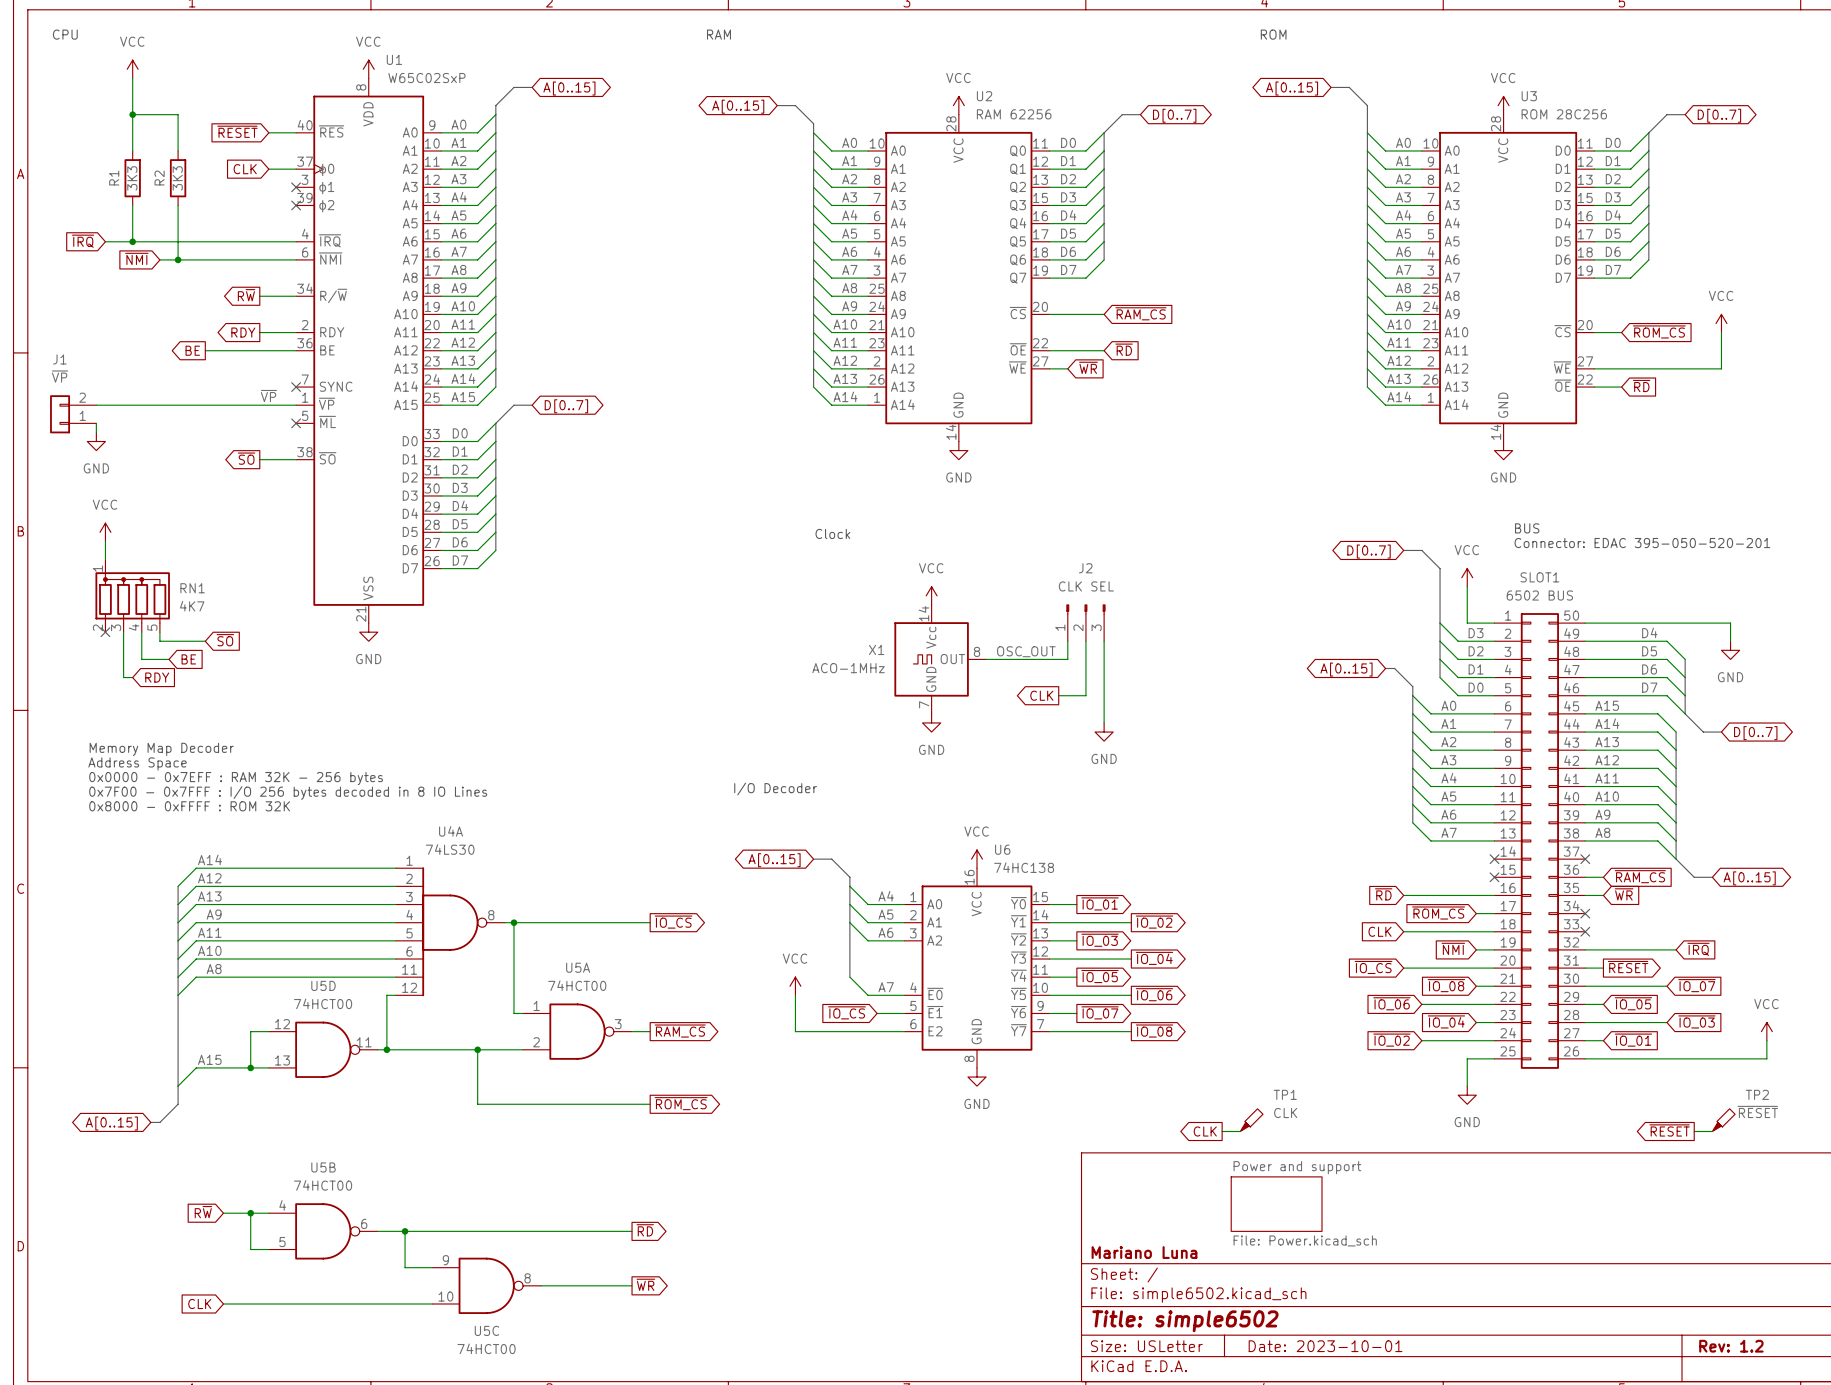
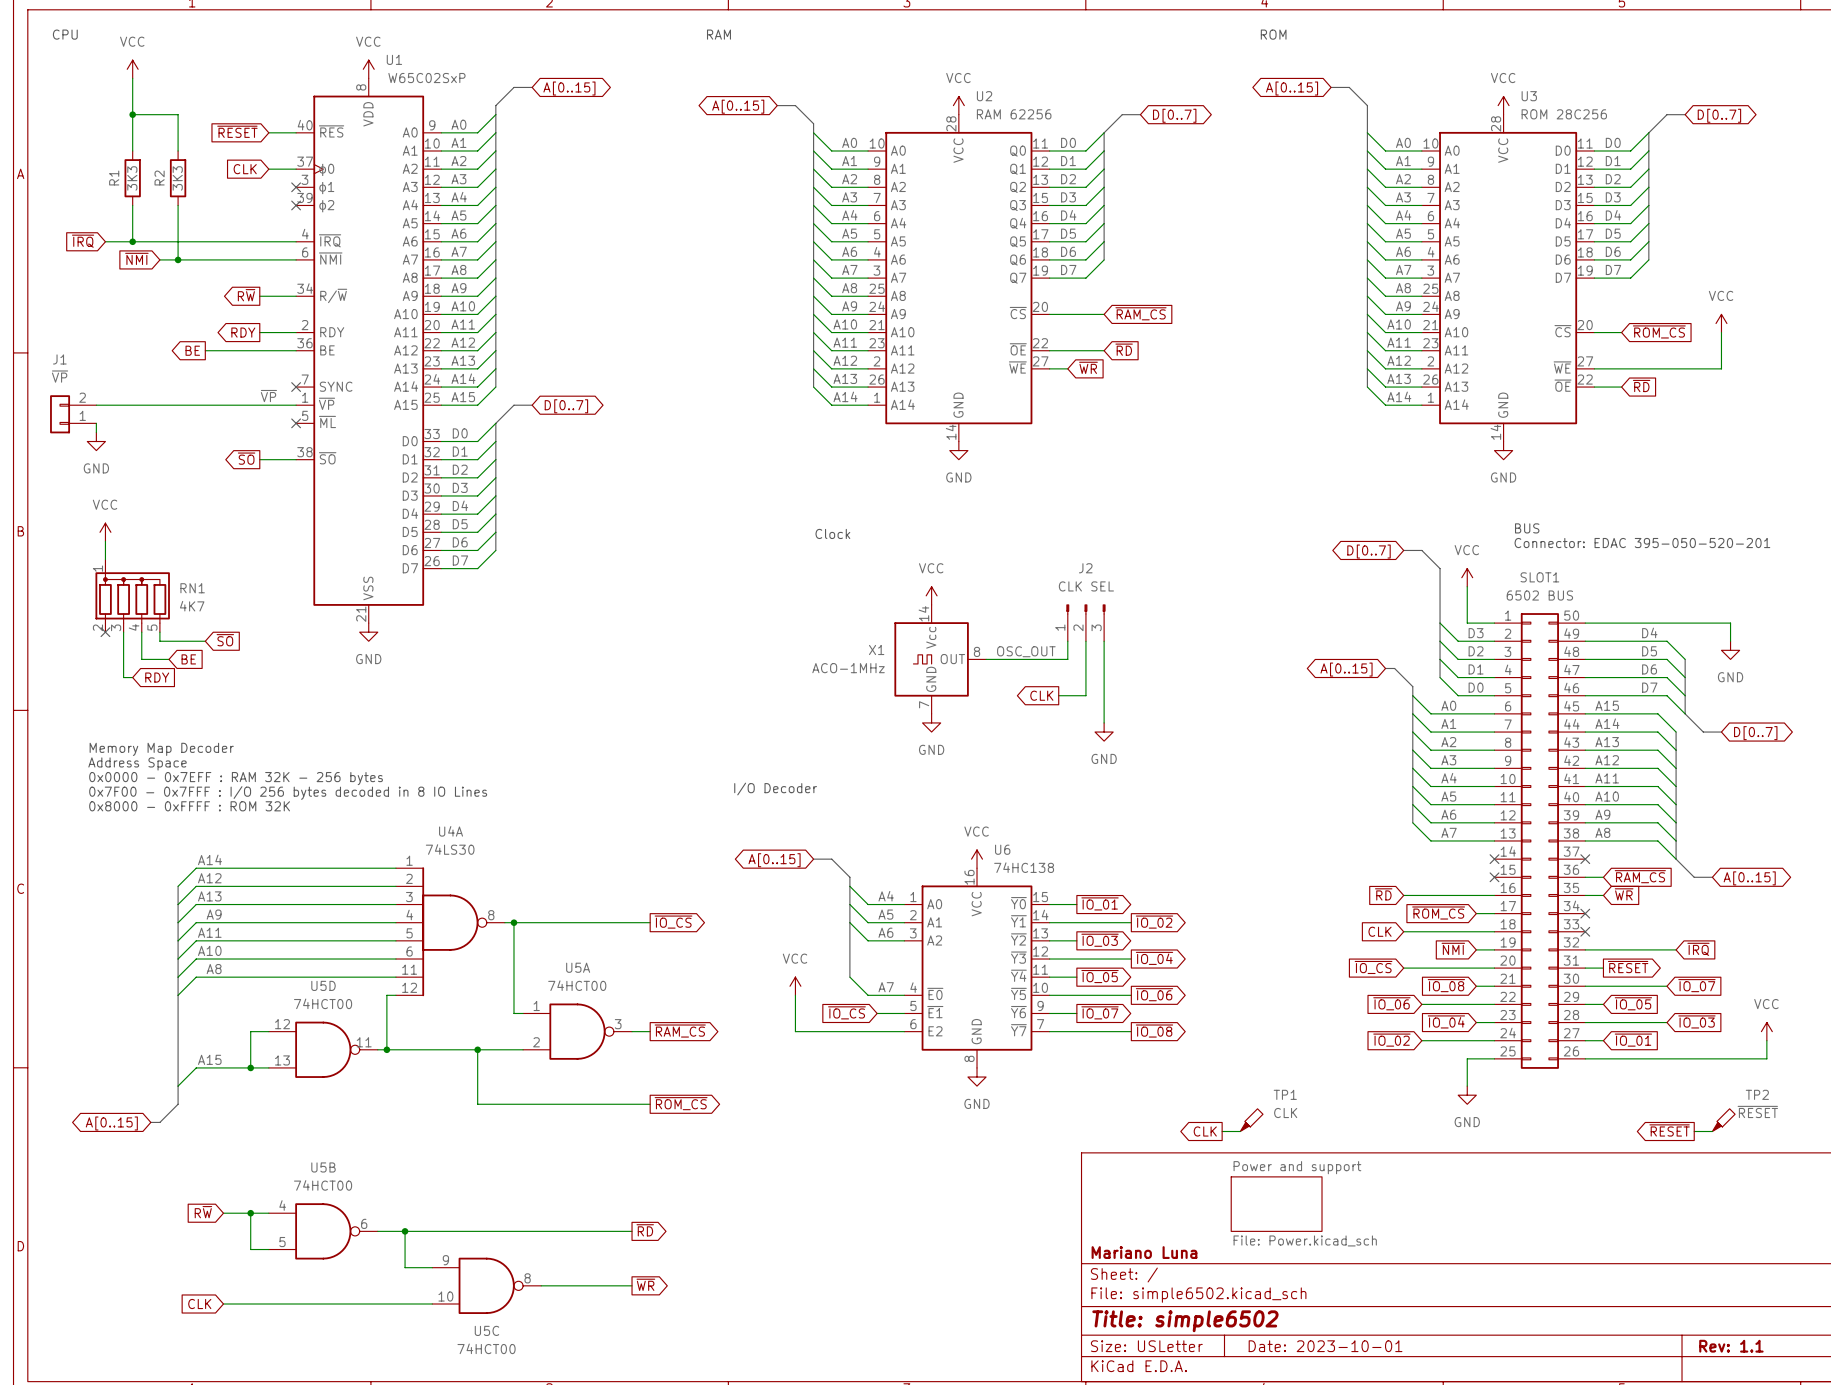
title block: Rev: 1.2 (1731, 1346) -> Rev: 1.1 (1731, 1346)

